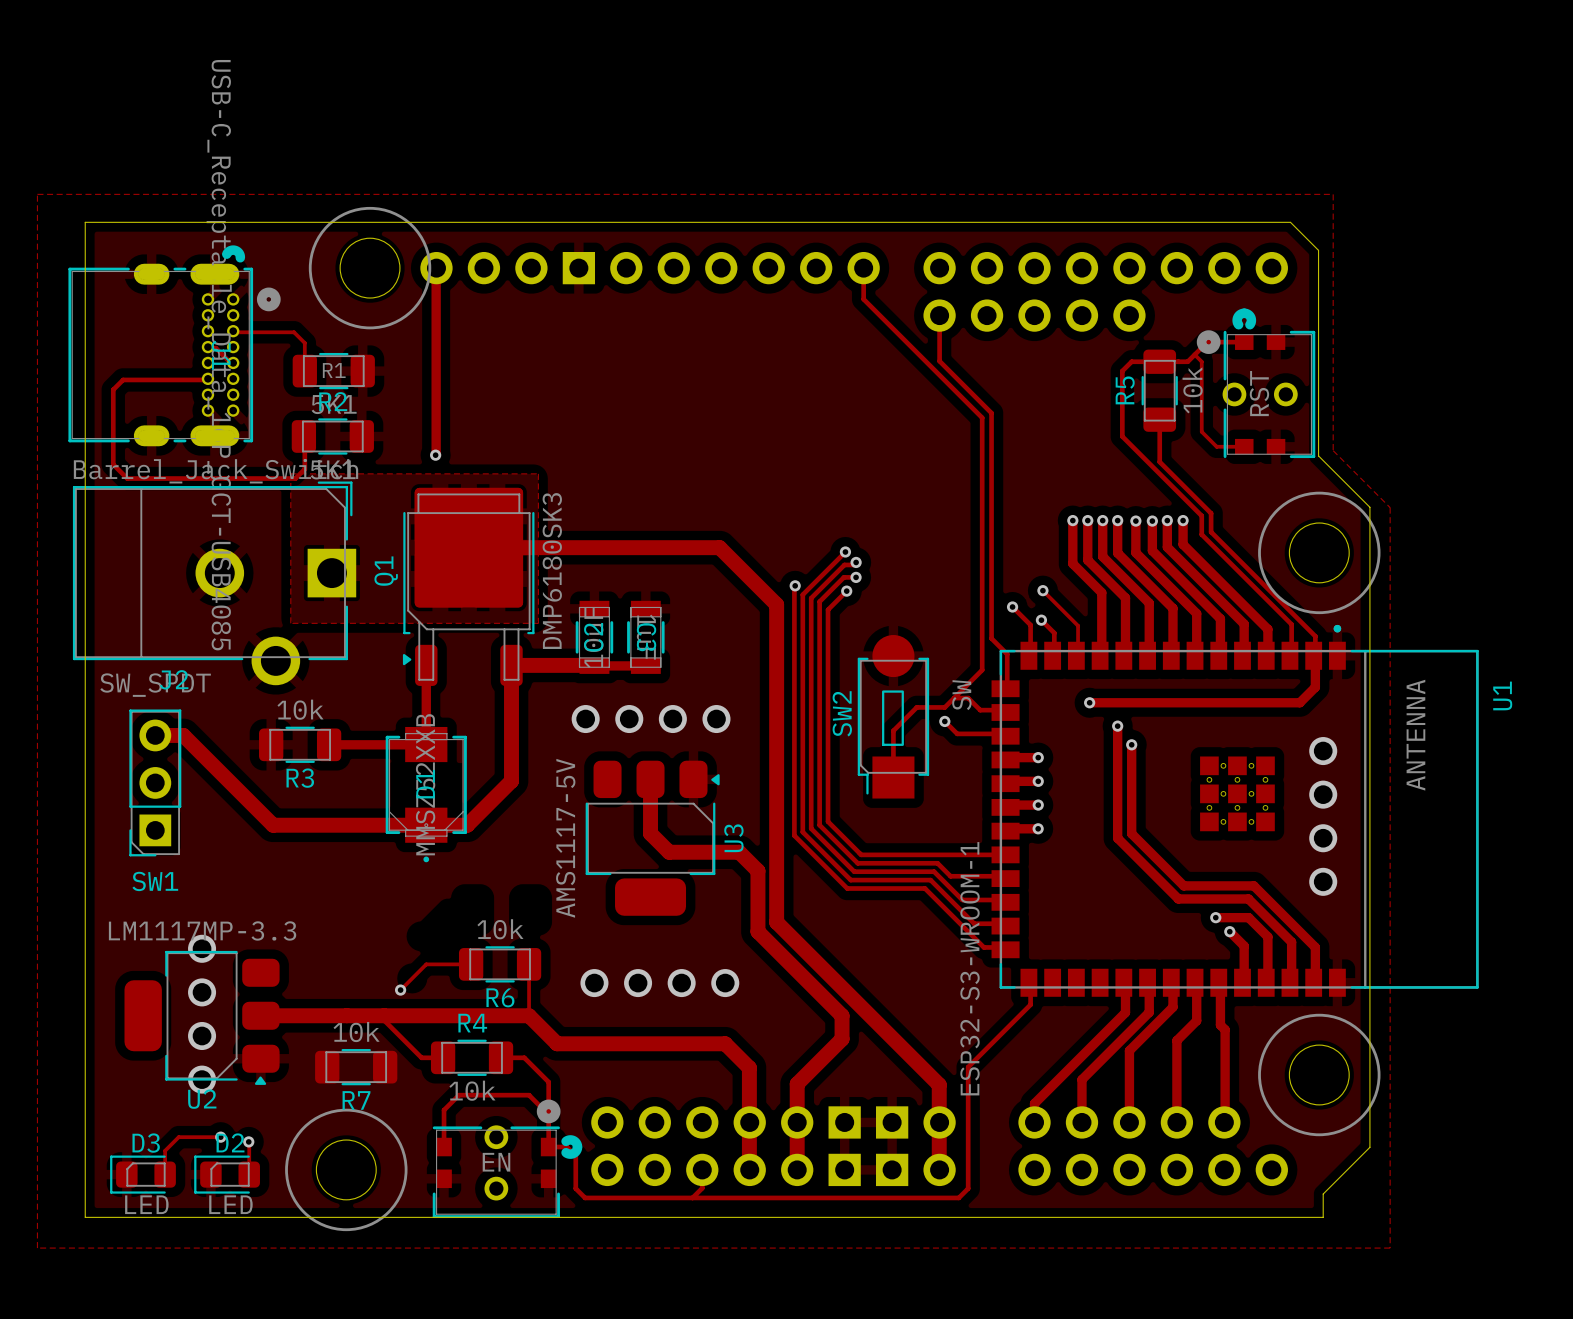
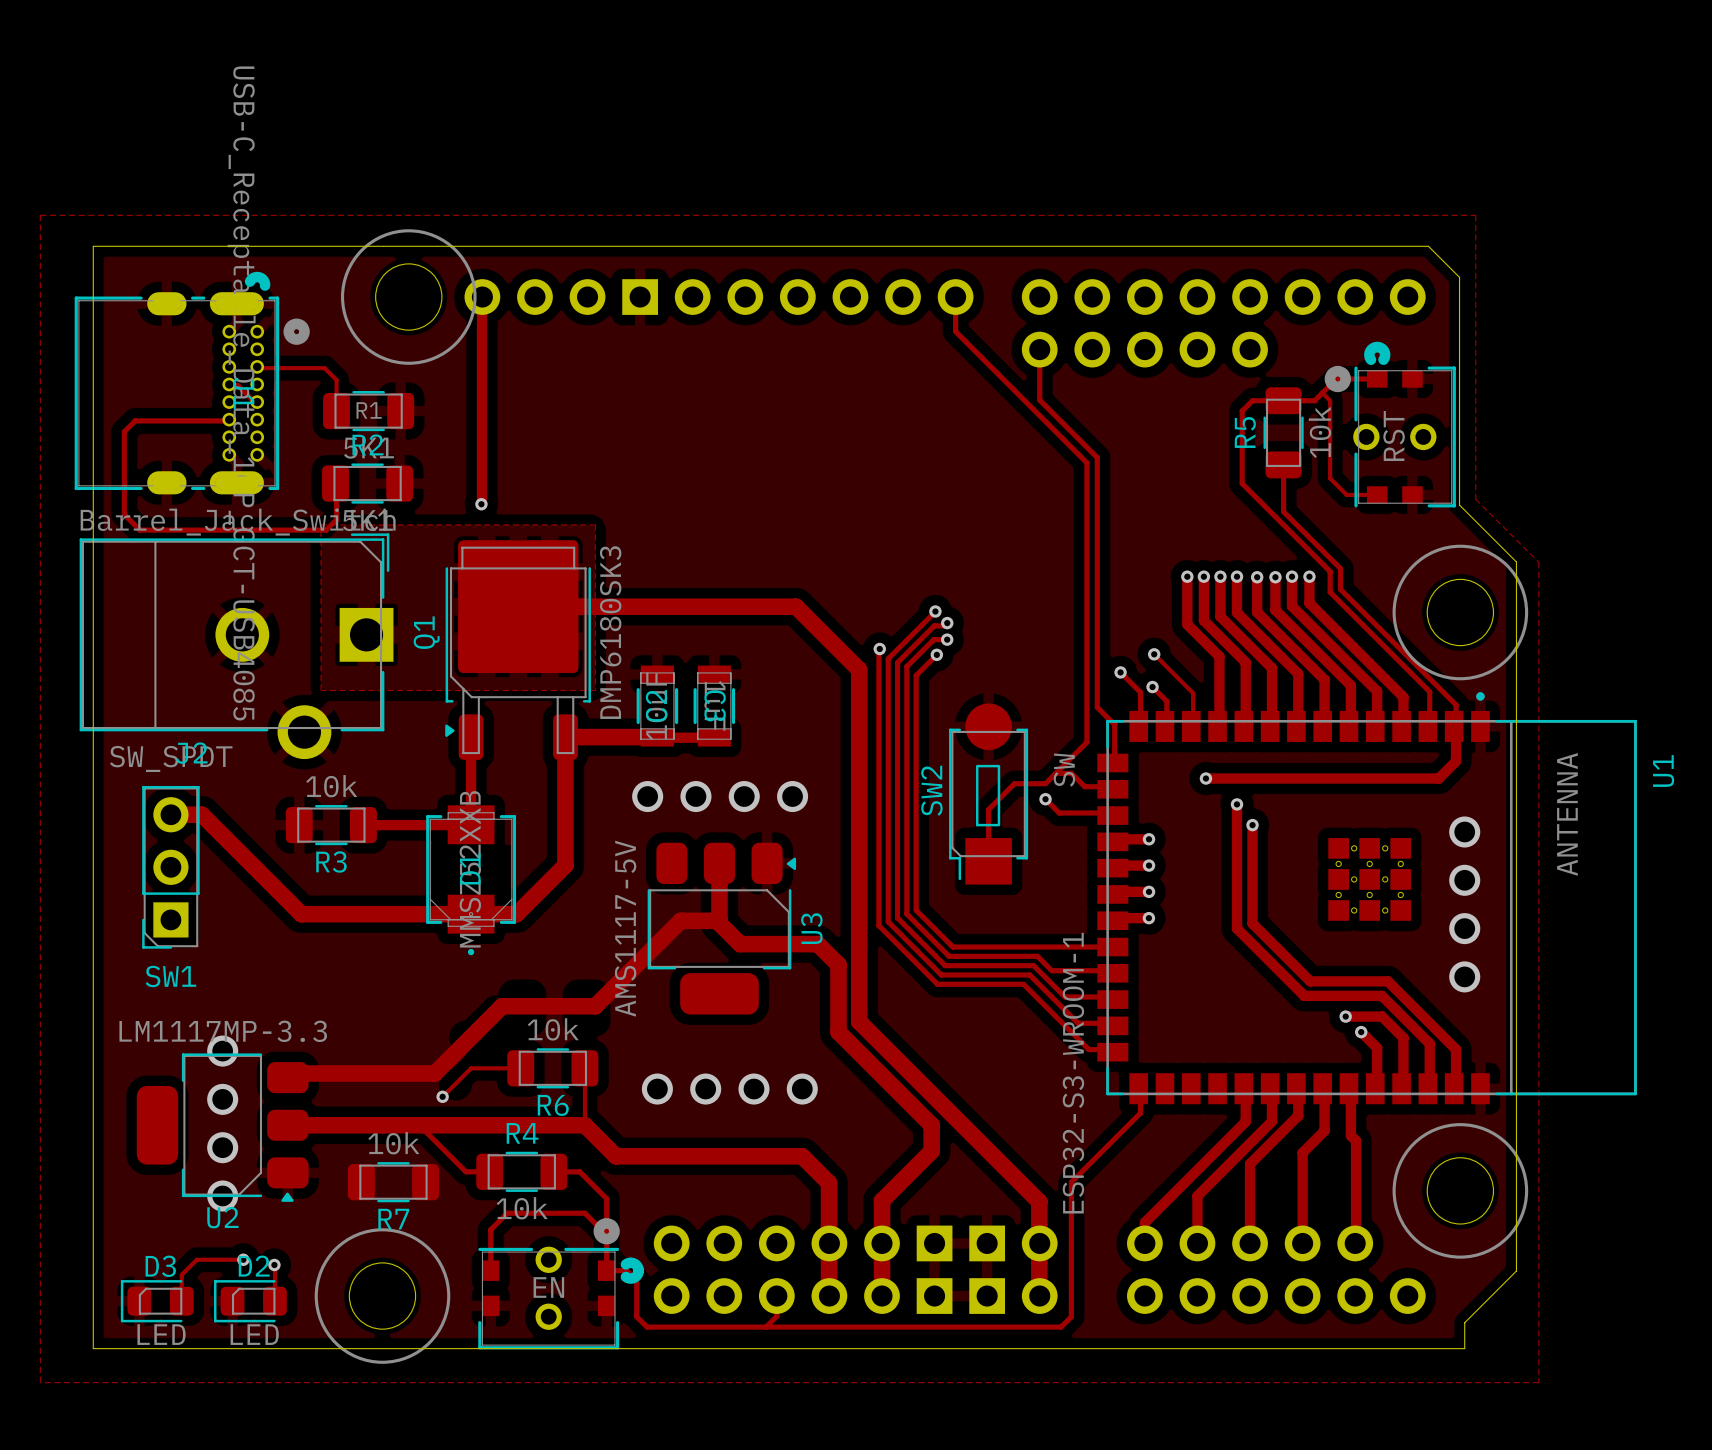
track: none -> (719, 920) (680, 920) (595, 1006) (502, 1006) (434, 1073) (292, 1073) (287, 1077)

